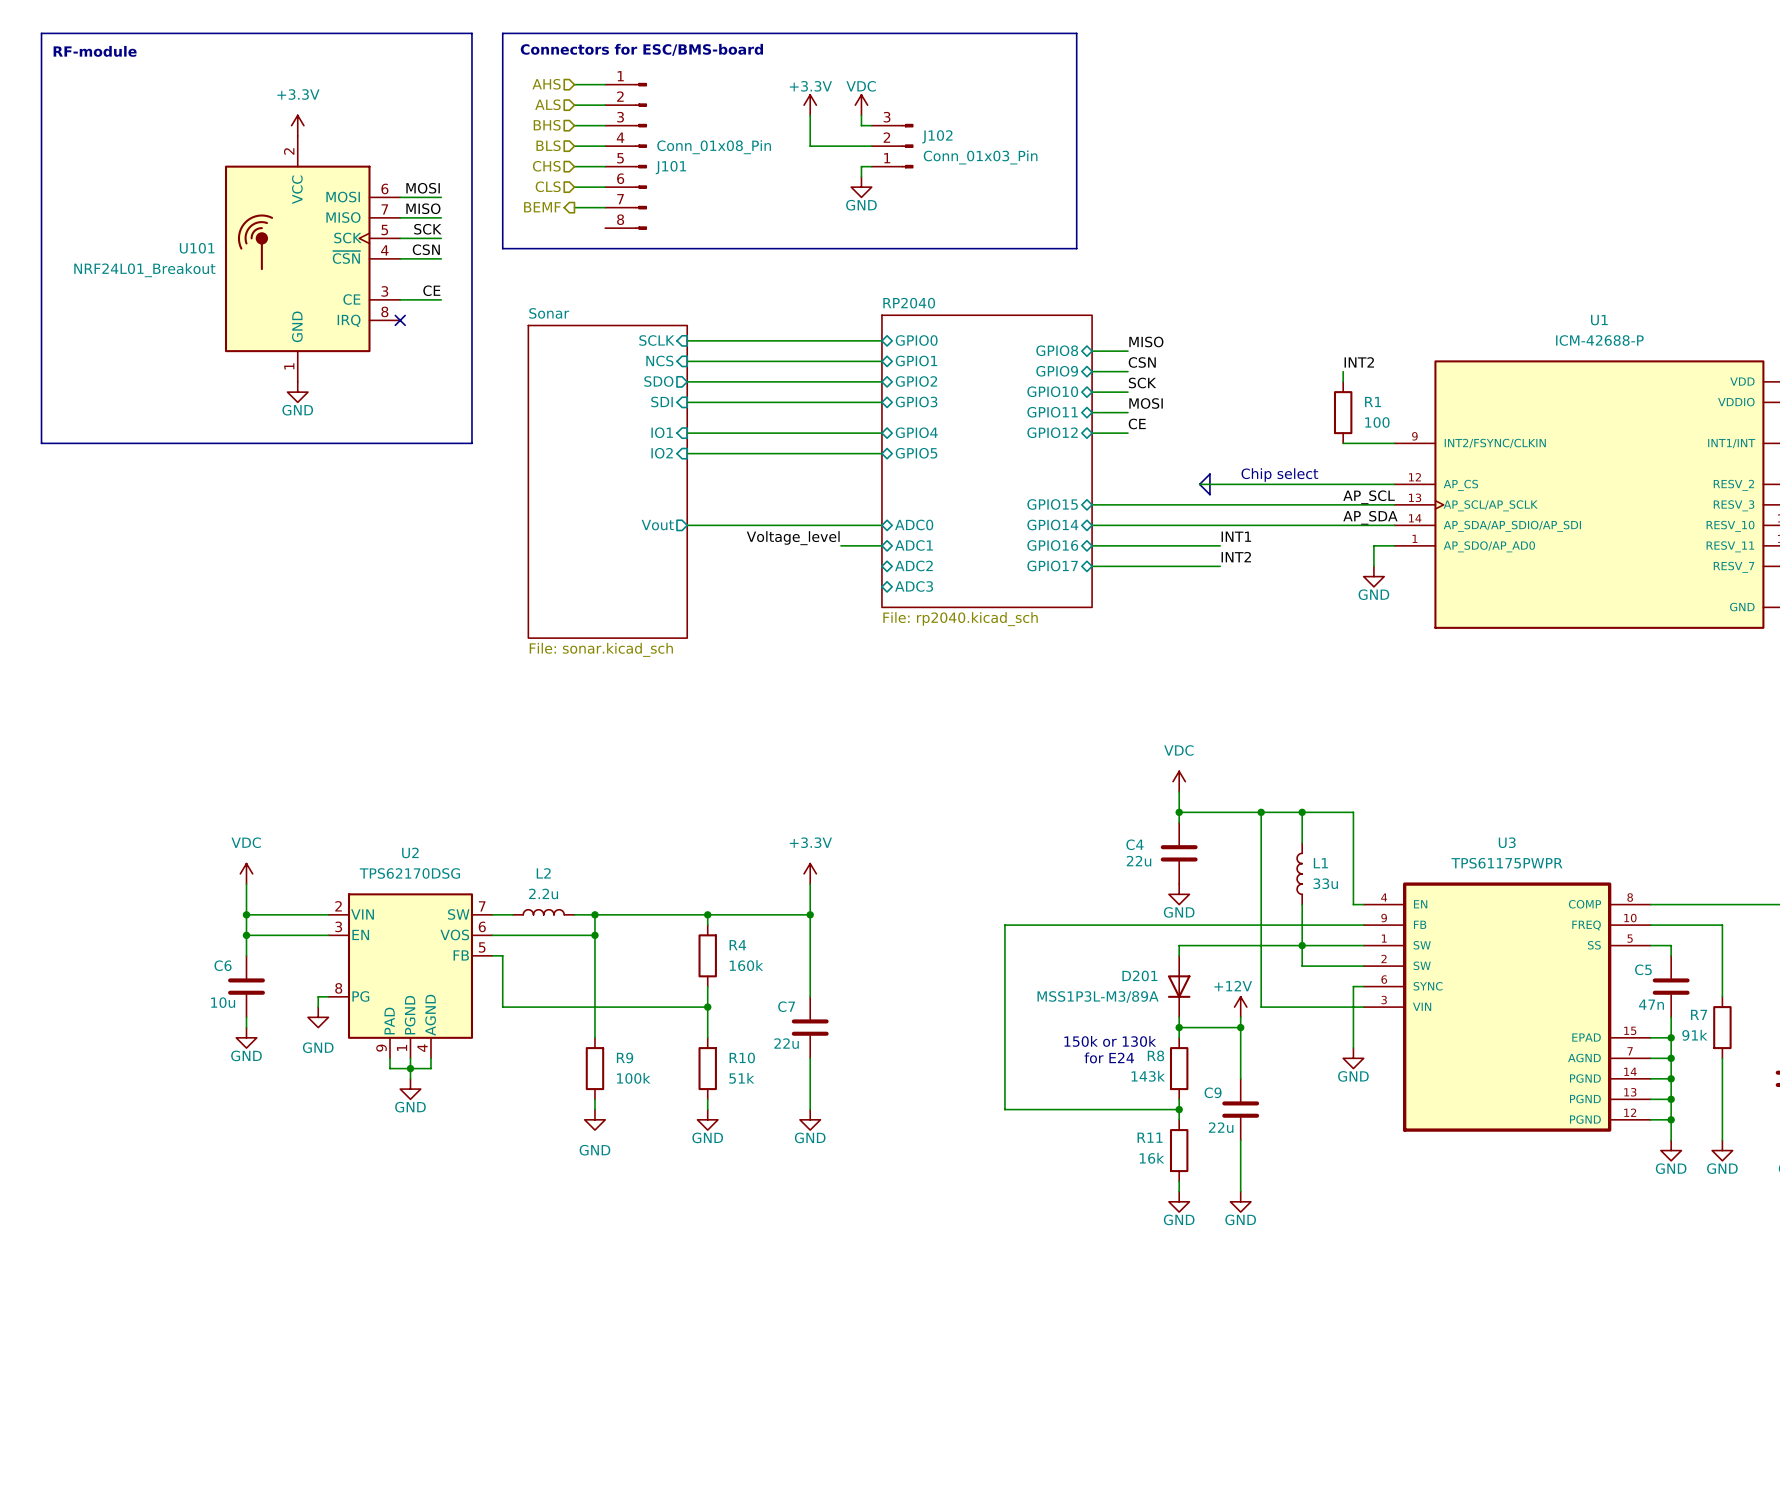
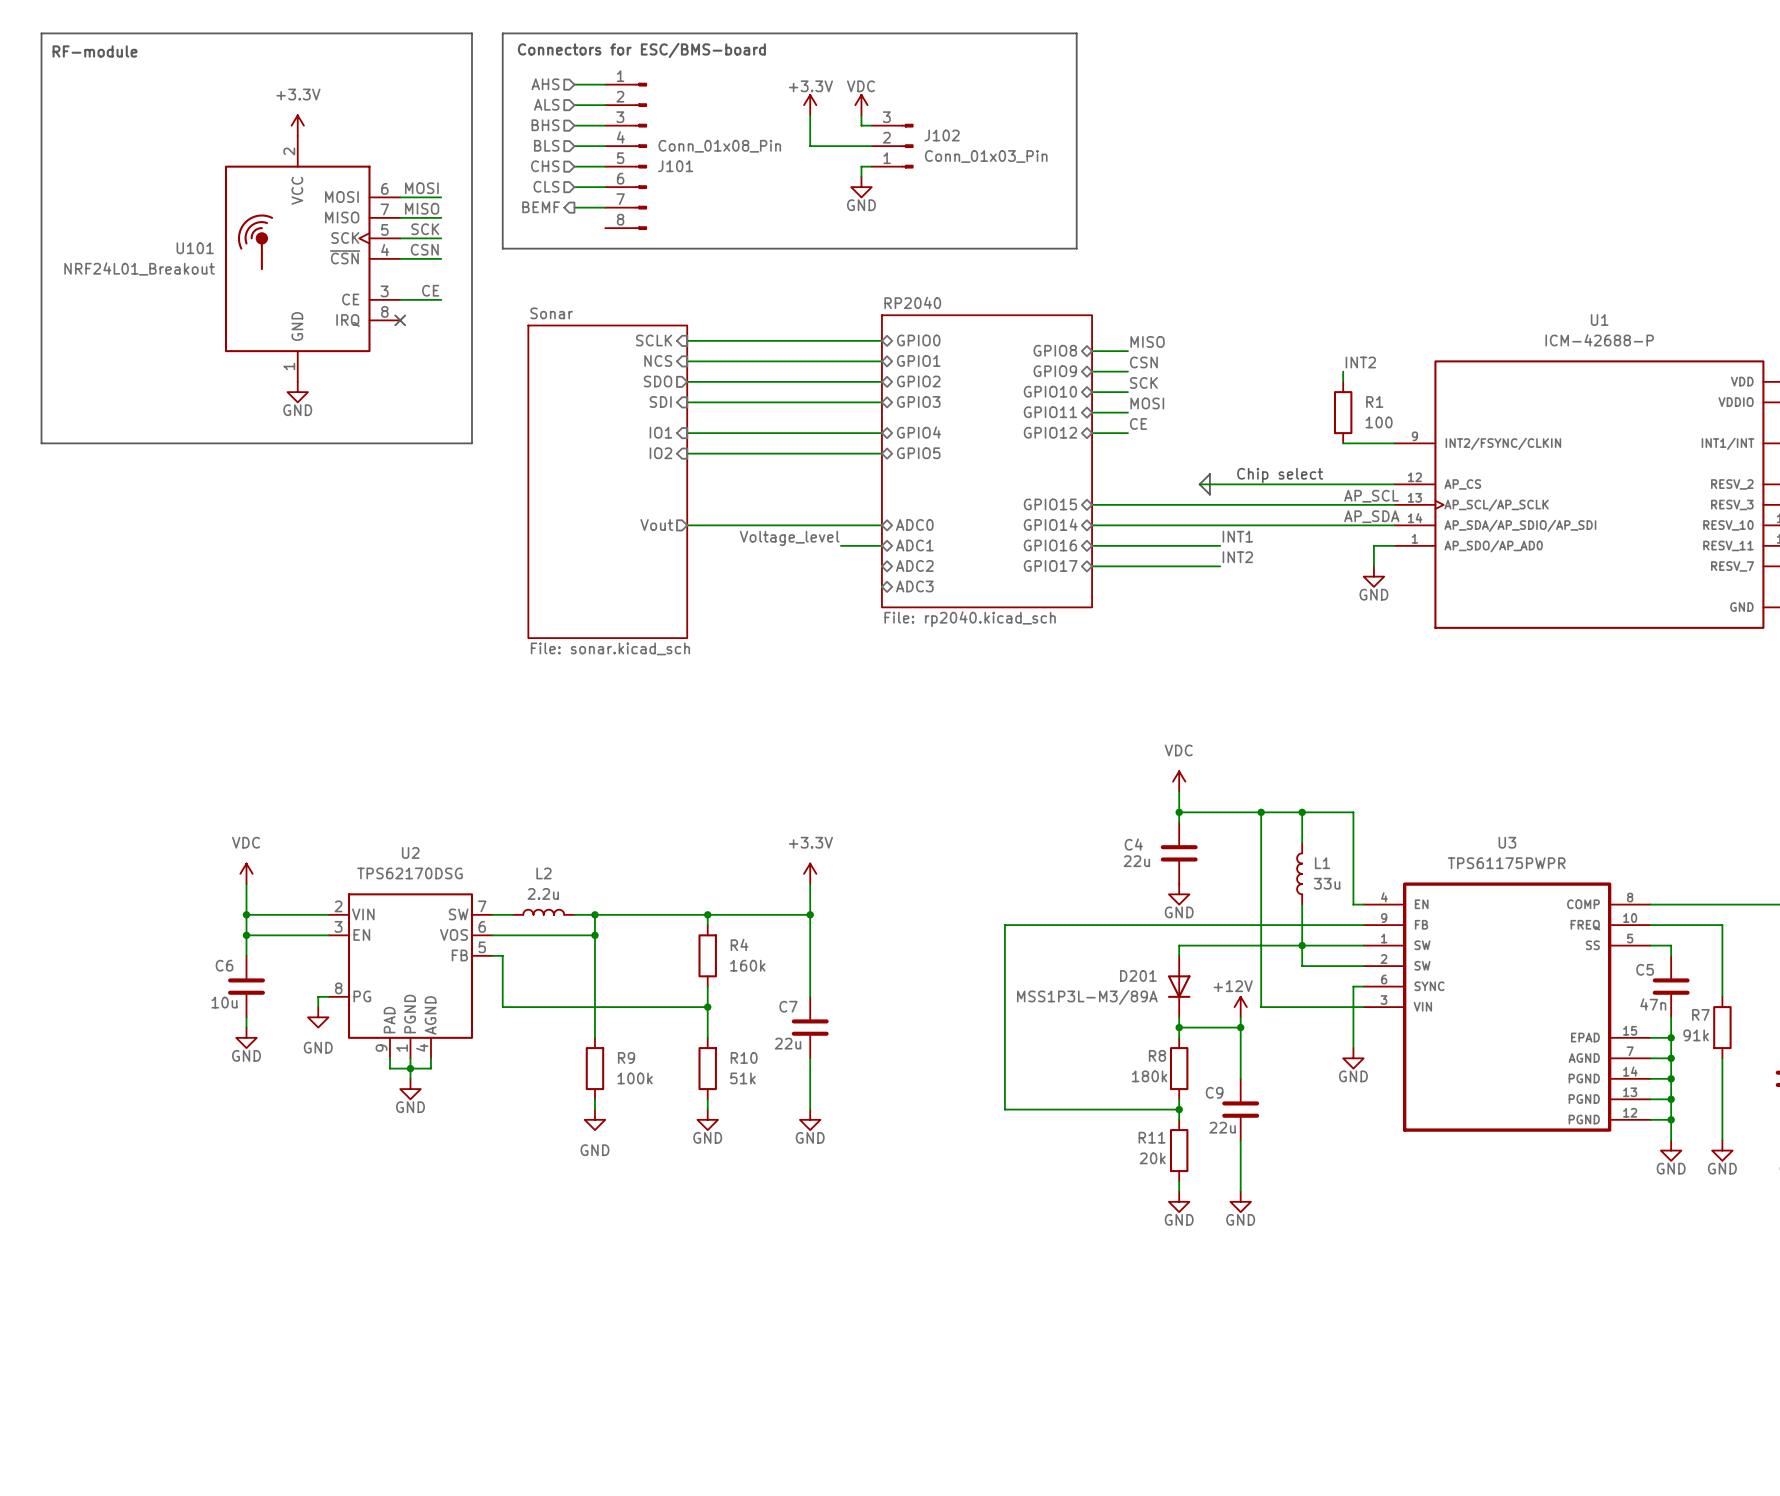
text: 150k or 130k (1110, 1041) -> none
text: for E24 (1109, 1057) -> none
R8 value: 143k (1148, 1076) -> 180k (1149, 1076)
R11 value: 16k (1151, 1158) -> 20k (1152, 1158)

